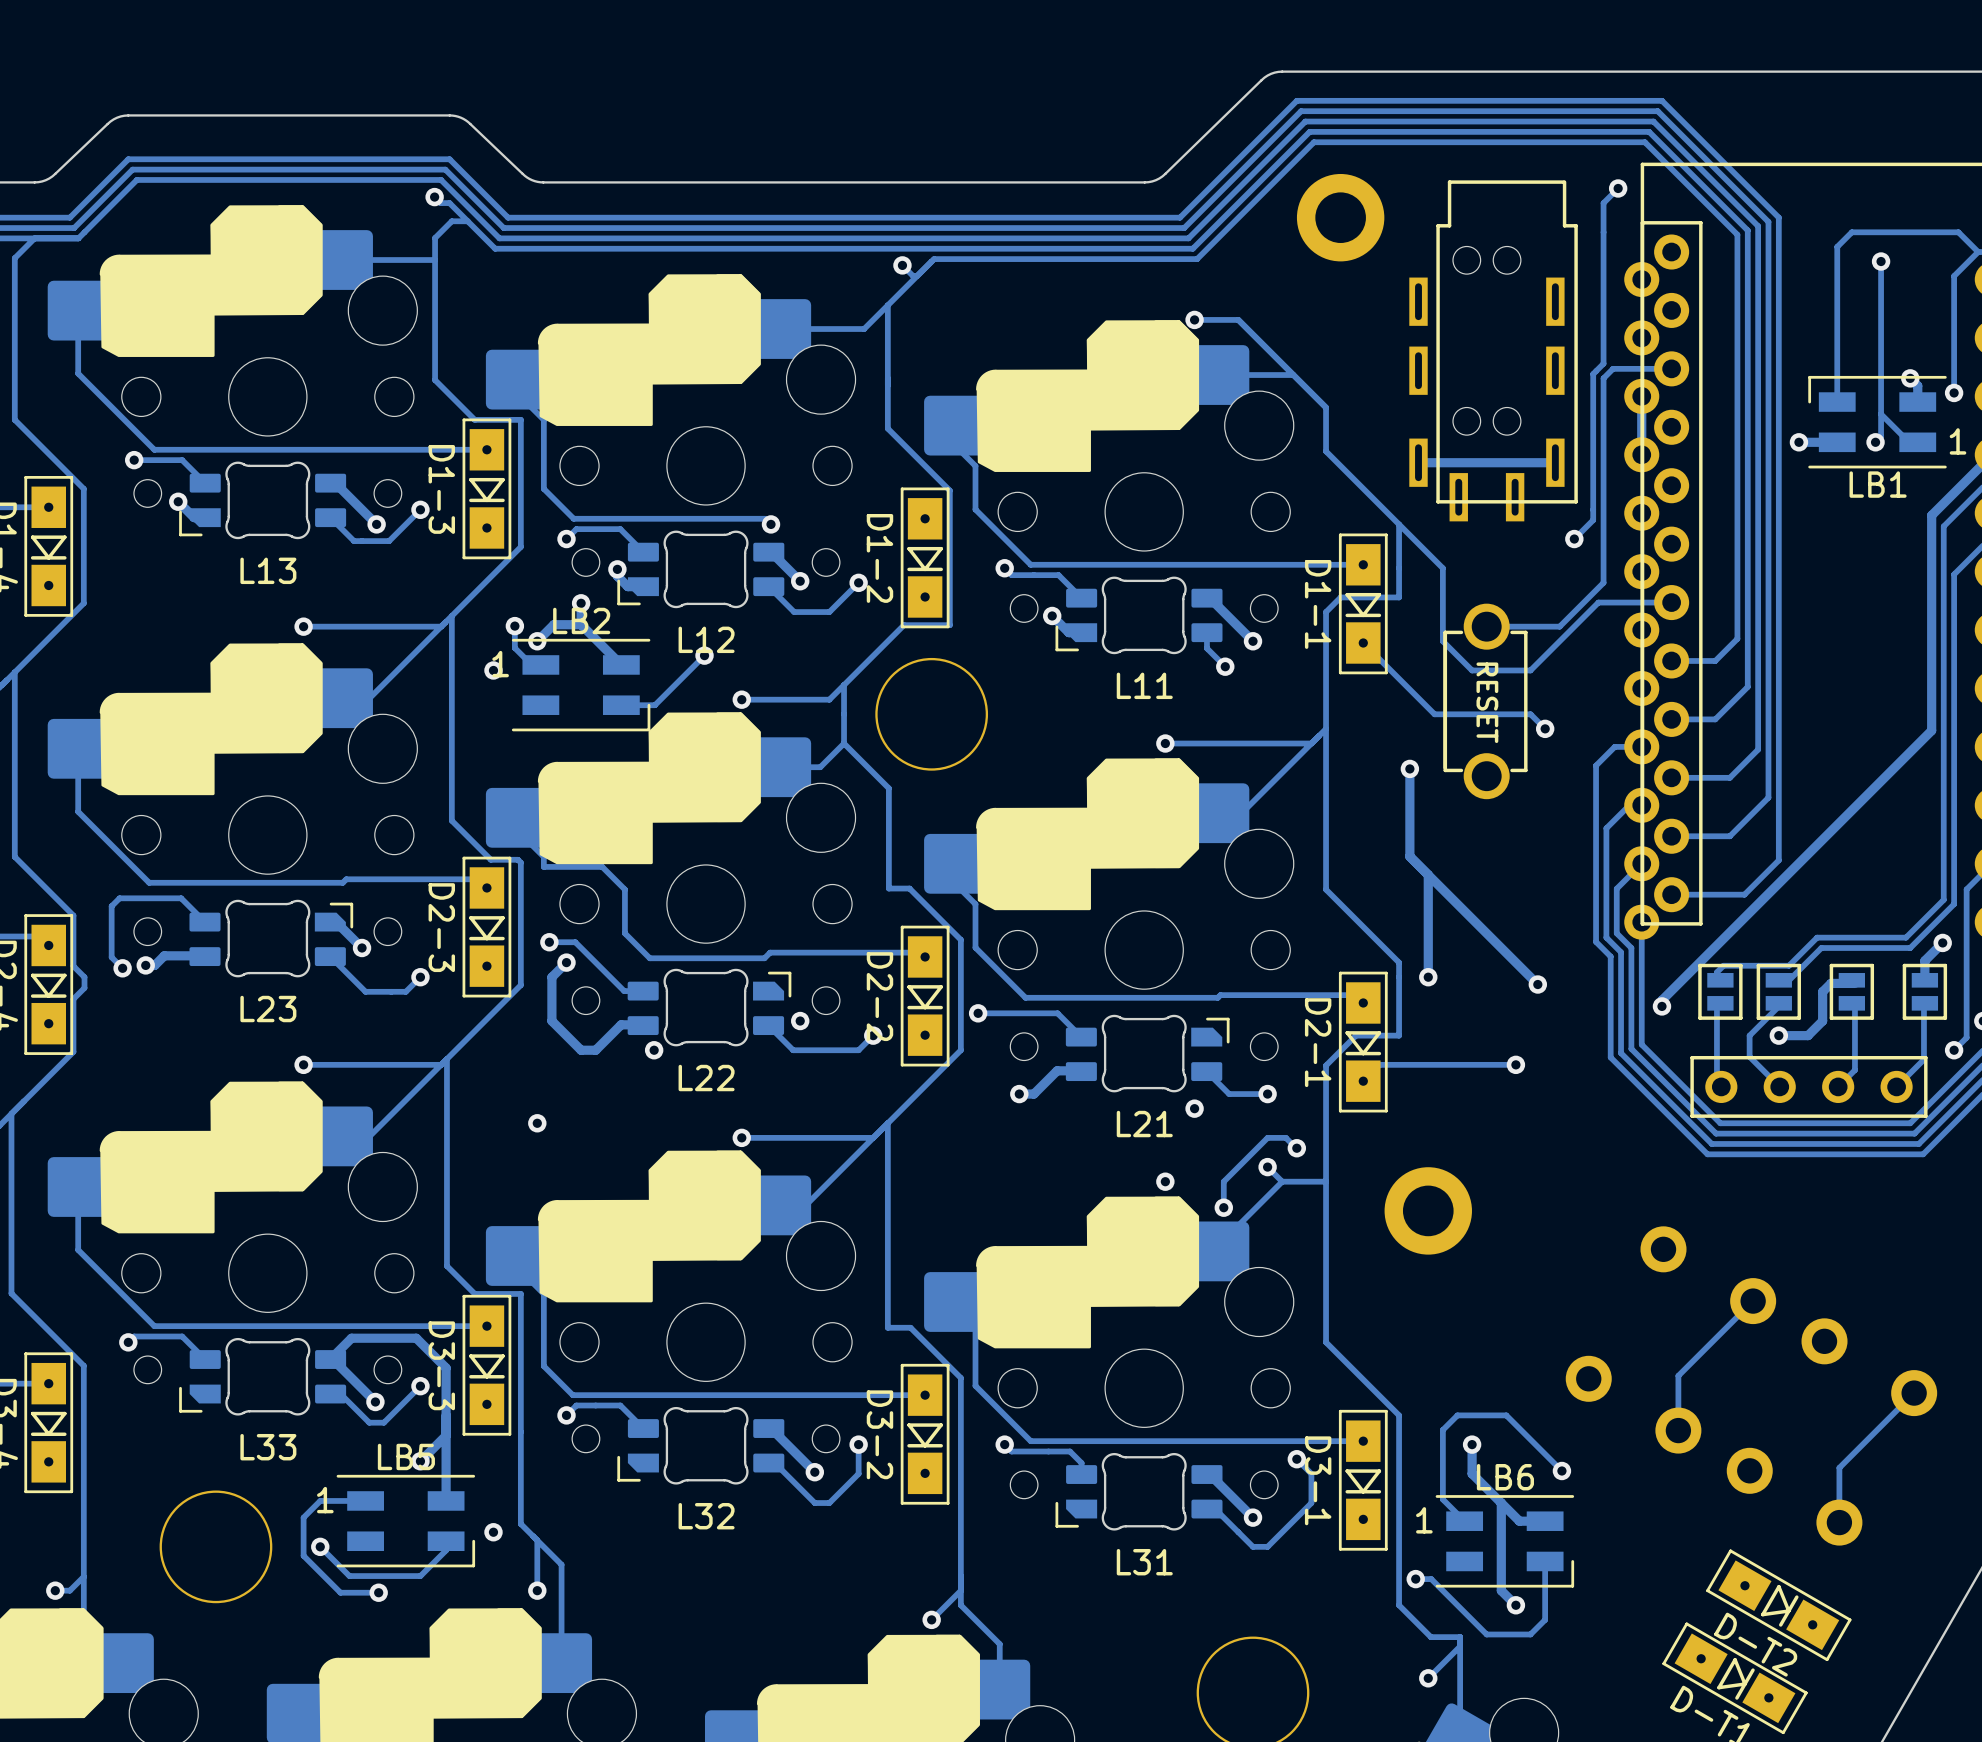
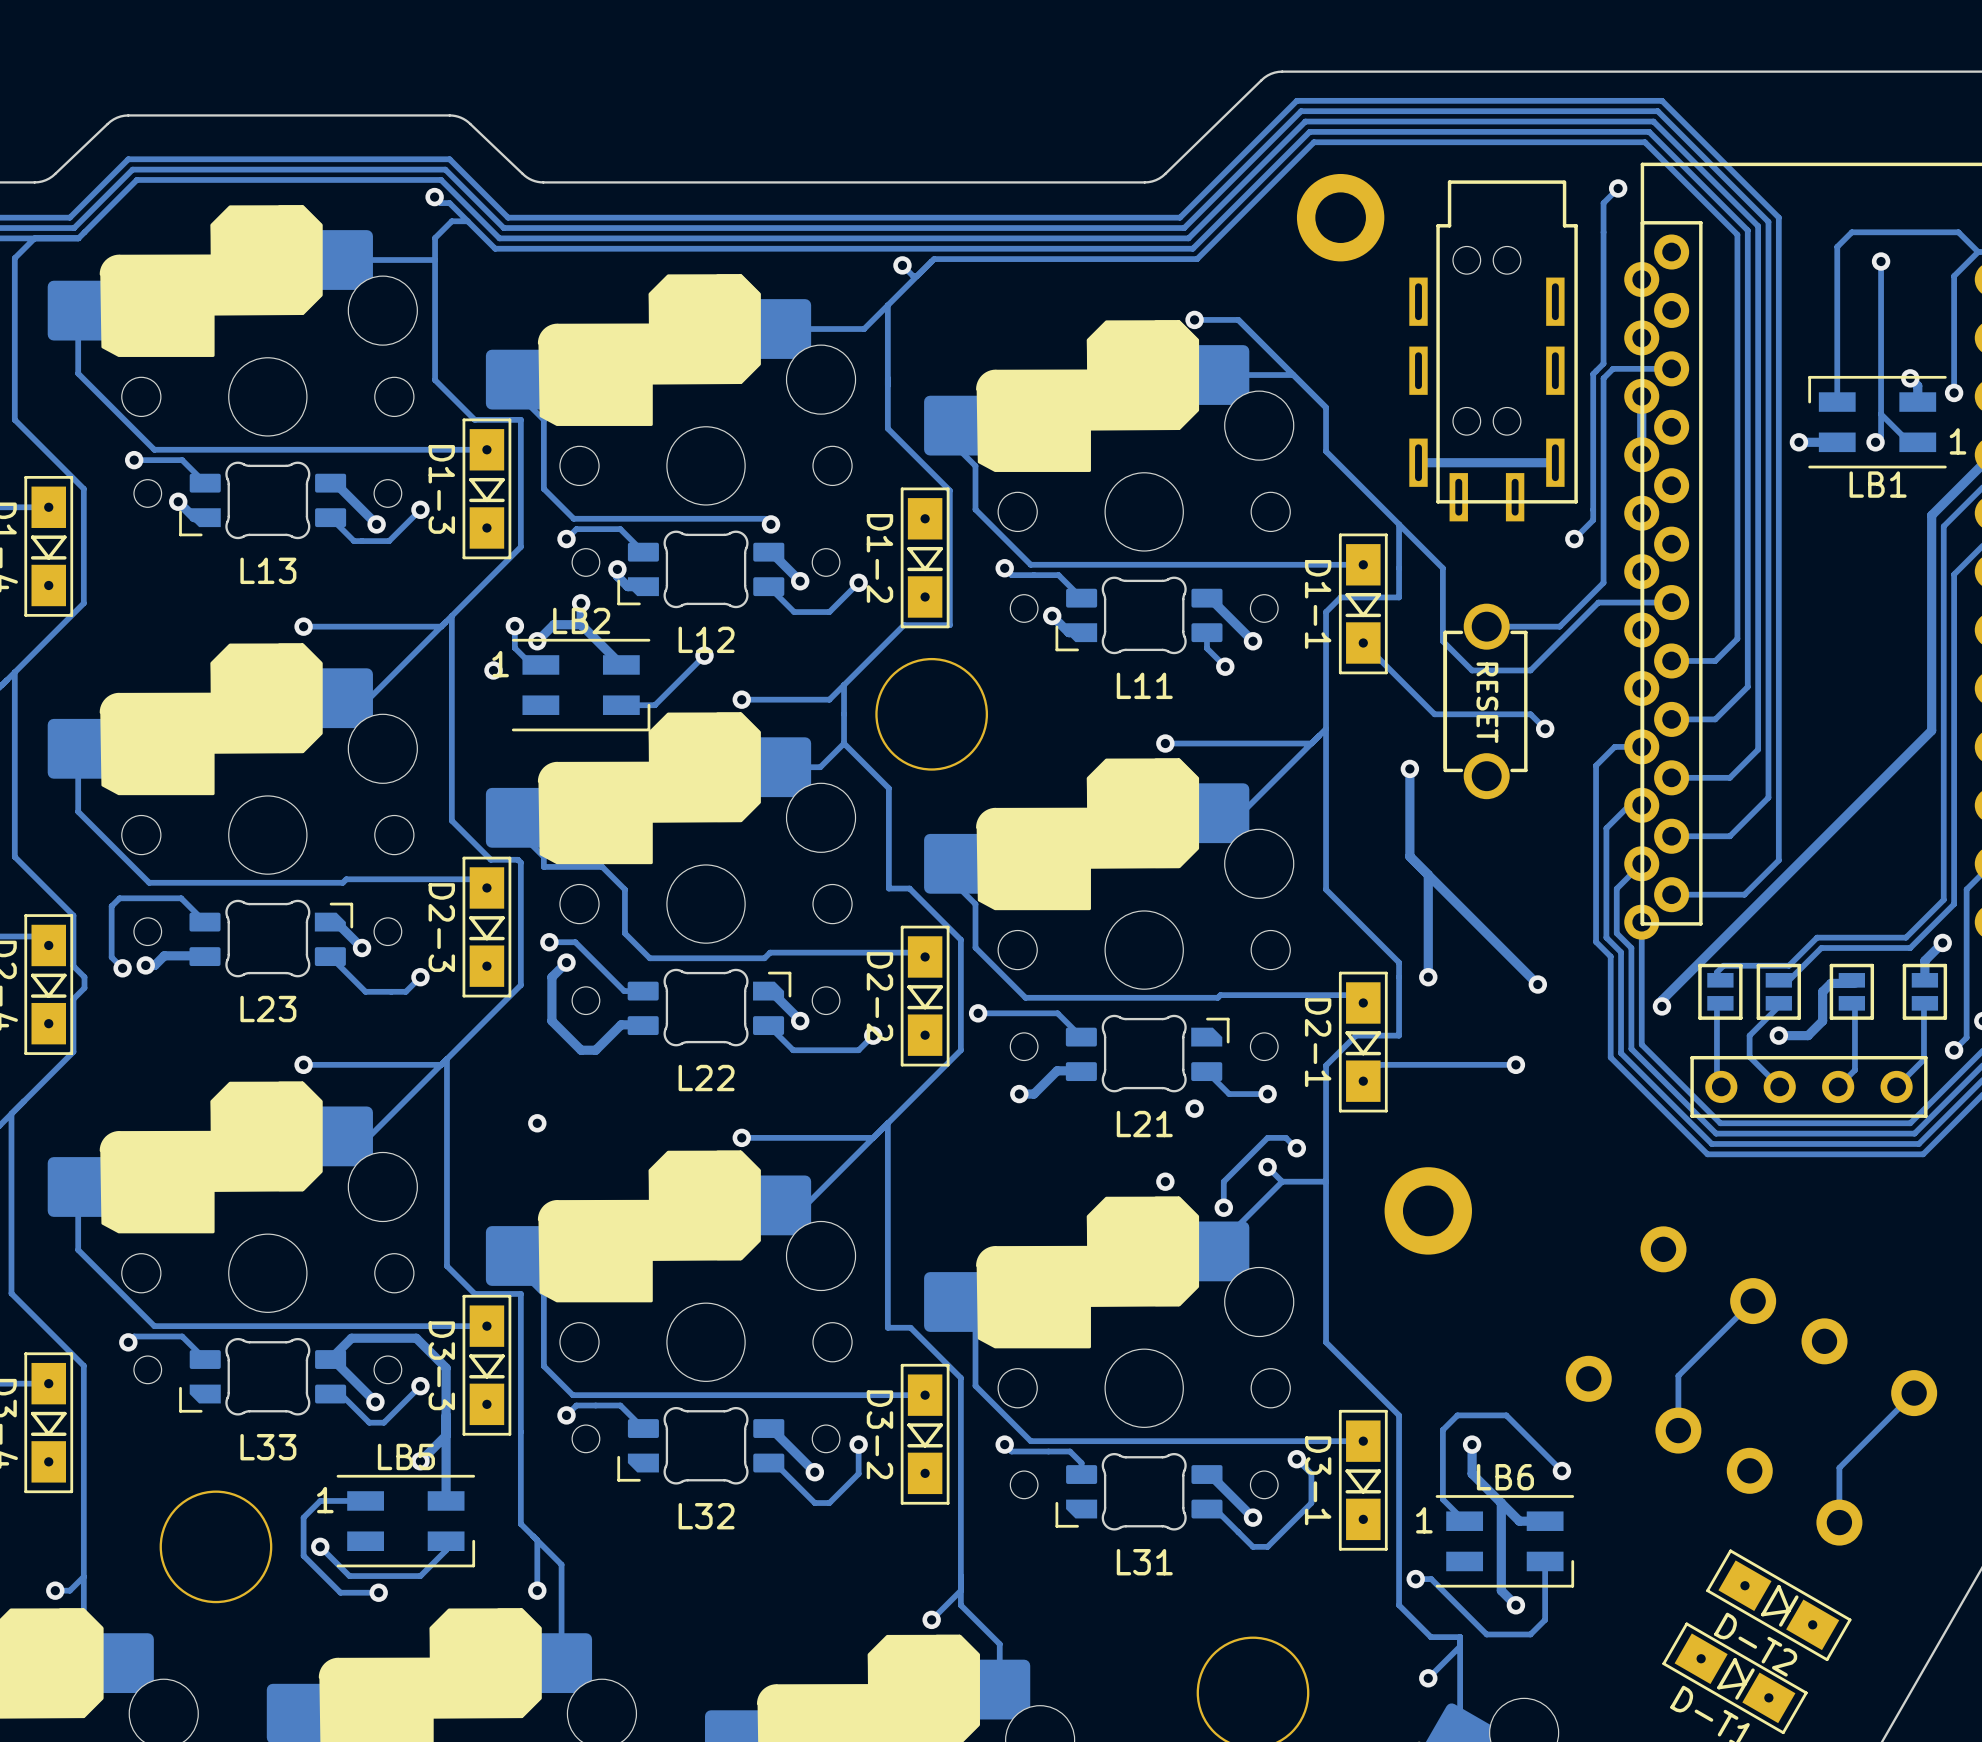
track: none -> (770, 991) (800, 1021)
via: (654, 1050) -> none
via: (493, 1532) -> none

